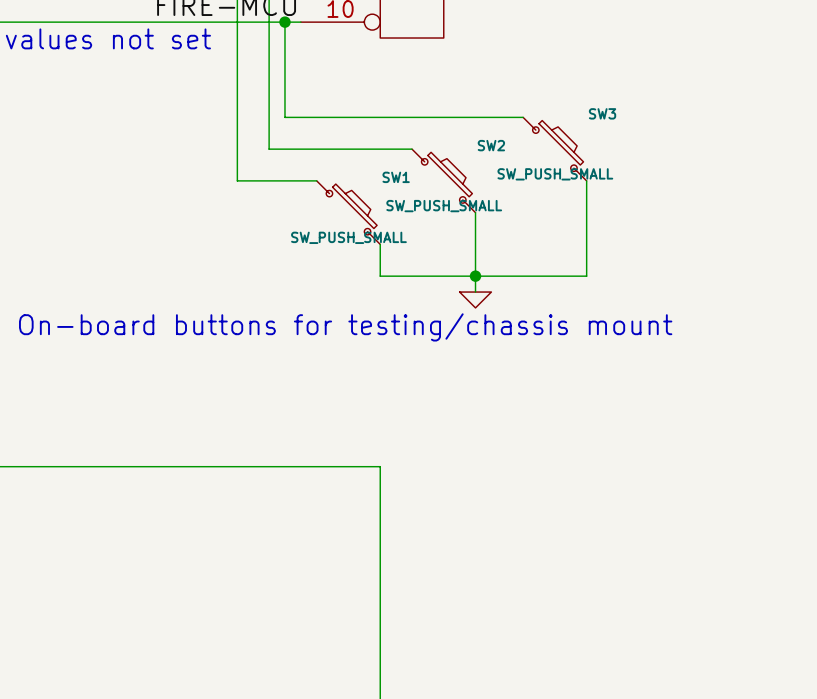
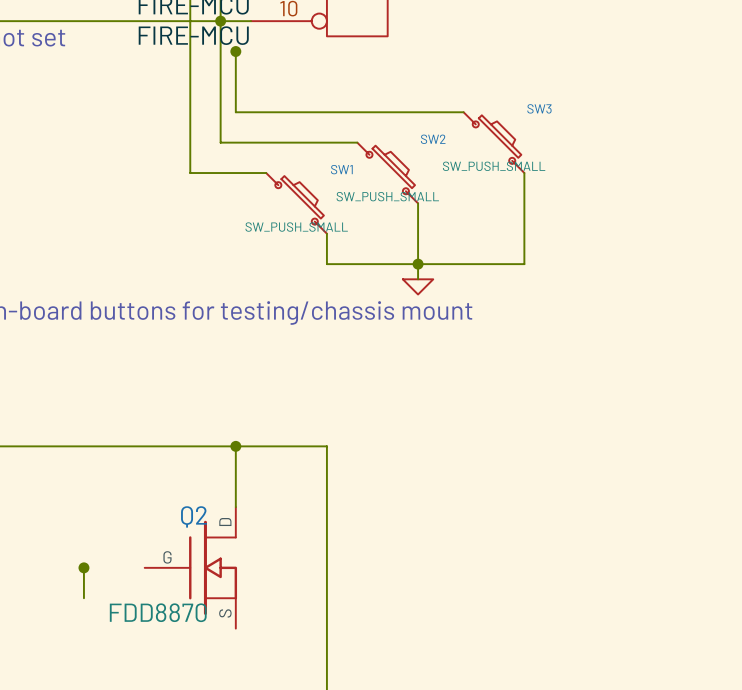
junction: none -> (220, 21)
junction: (284, 22) -> none
label: none -> FIRE-MCU (193, 35)
junction: none -> (235, 51)
wire: none -> (235, 446) (235, 507)
junction: none -> (235, 446)
wire: none -> (83, 567) (83, 598)
junction: none -> (83, 567)
Q2: none -> FDD8870 (190, 567)

